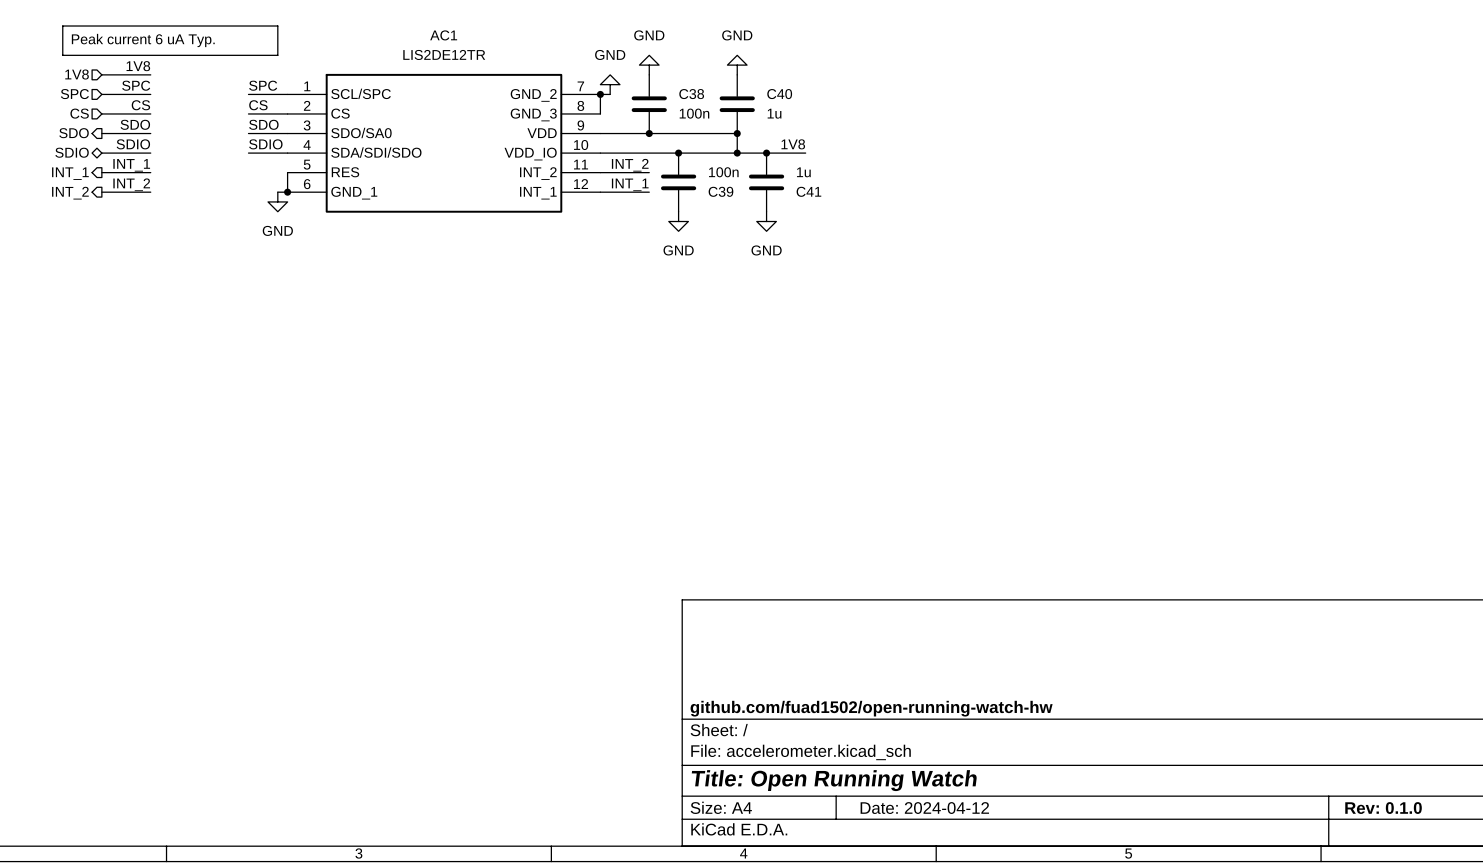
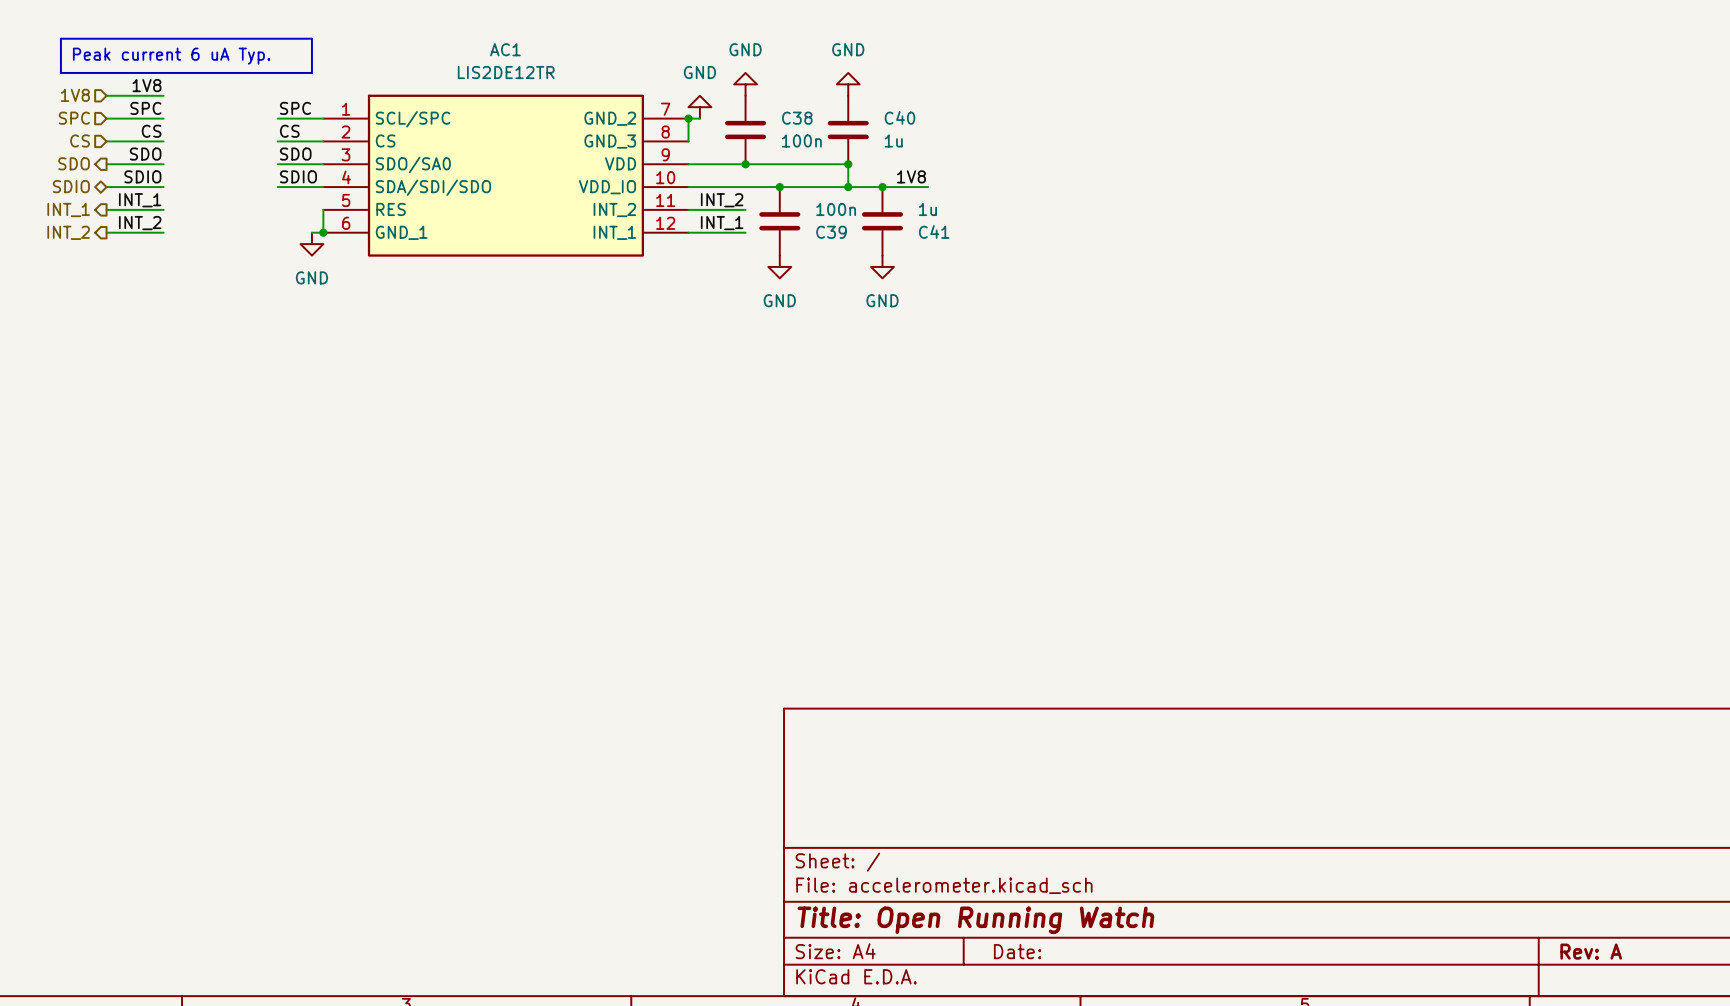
title block: github.com/fuad1502/open-running-watch-hw (871, 708) -> none
title block: Date: 2024-04-12 (924, 808) -> Date: (1017, 951)
title block: Rev: 0.1.0 (1383, 808) -> Rev: A (1591, 951)

